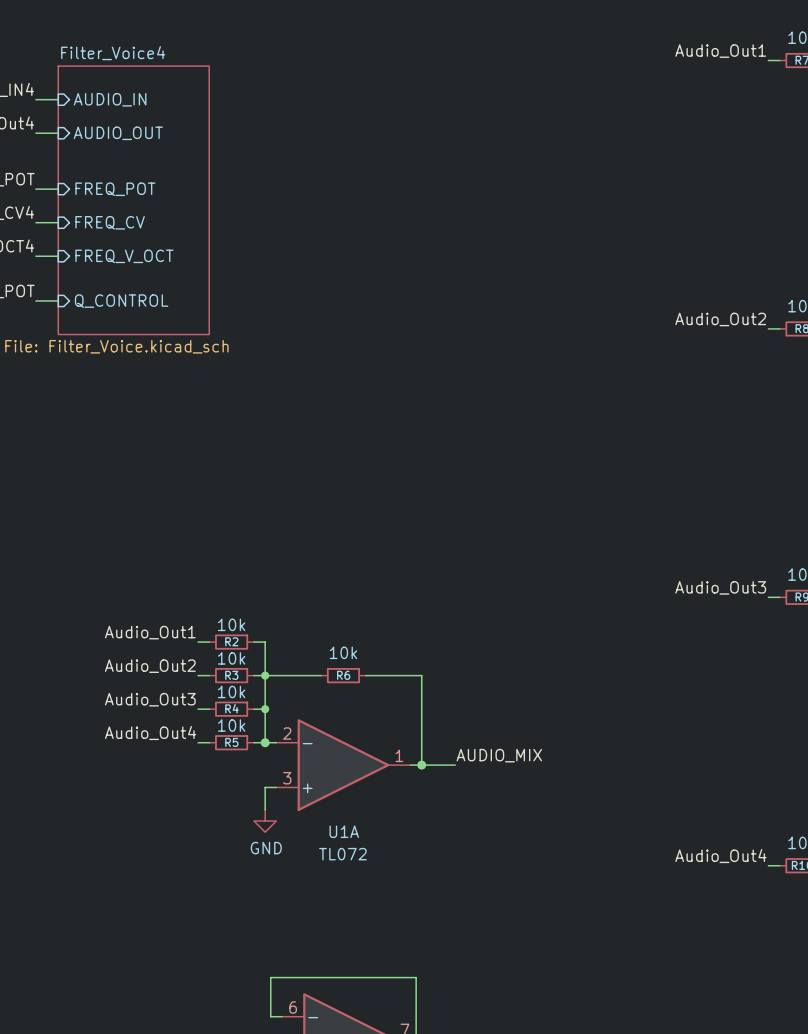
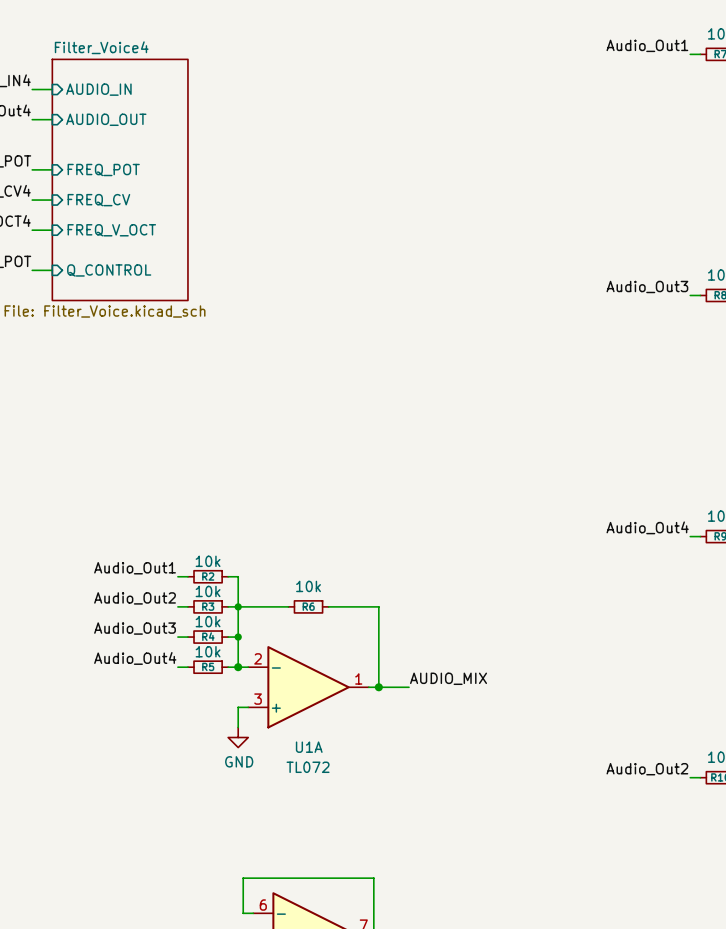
label: Audio_Out2 (720, 319) -> Audio_Out3 (647, 286)
label: Audio_Out3 (720, 587) -> Audio_Out4 (647, 527)
label: Audio_Out4 (720, 856) -> Audio_Out2 (647, 769)

